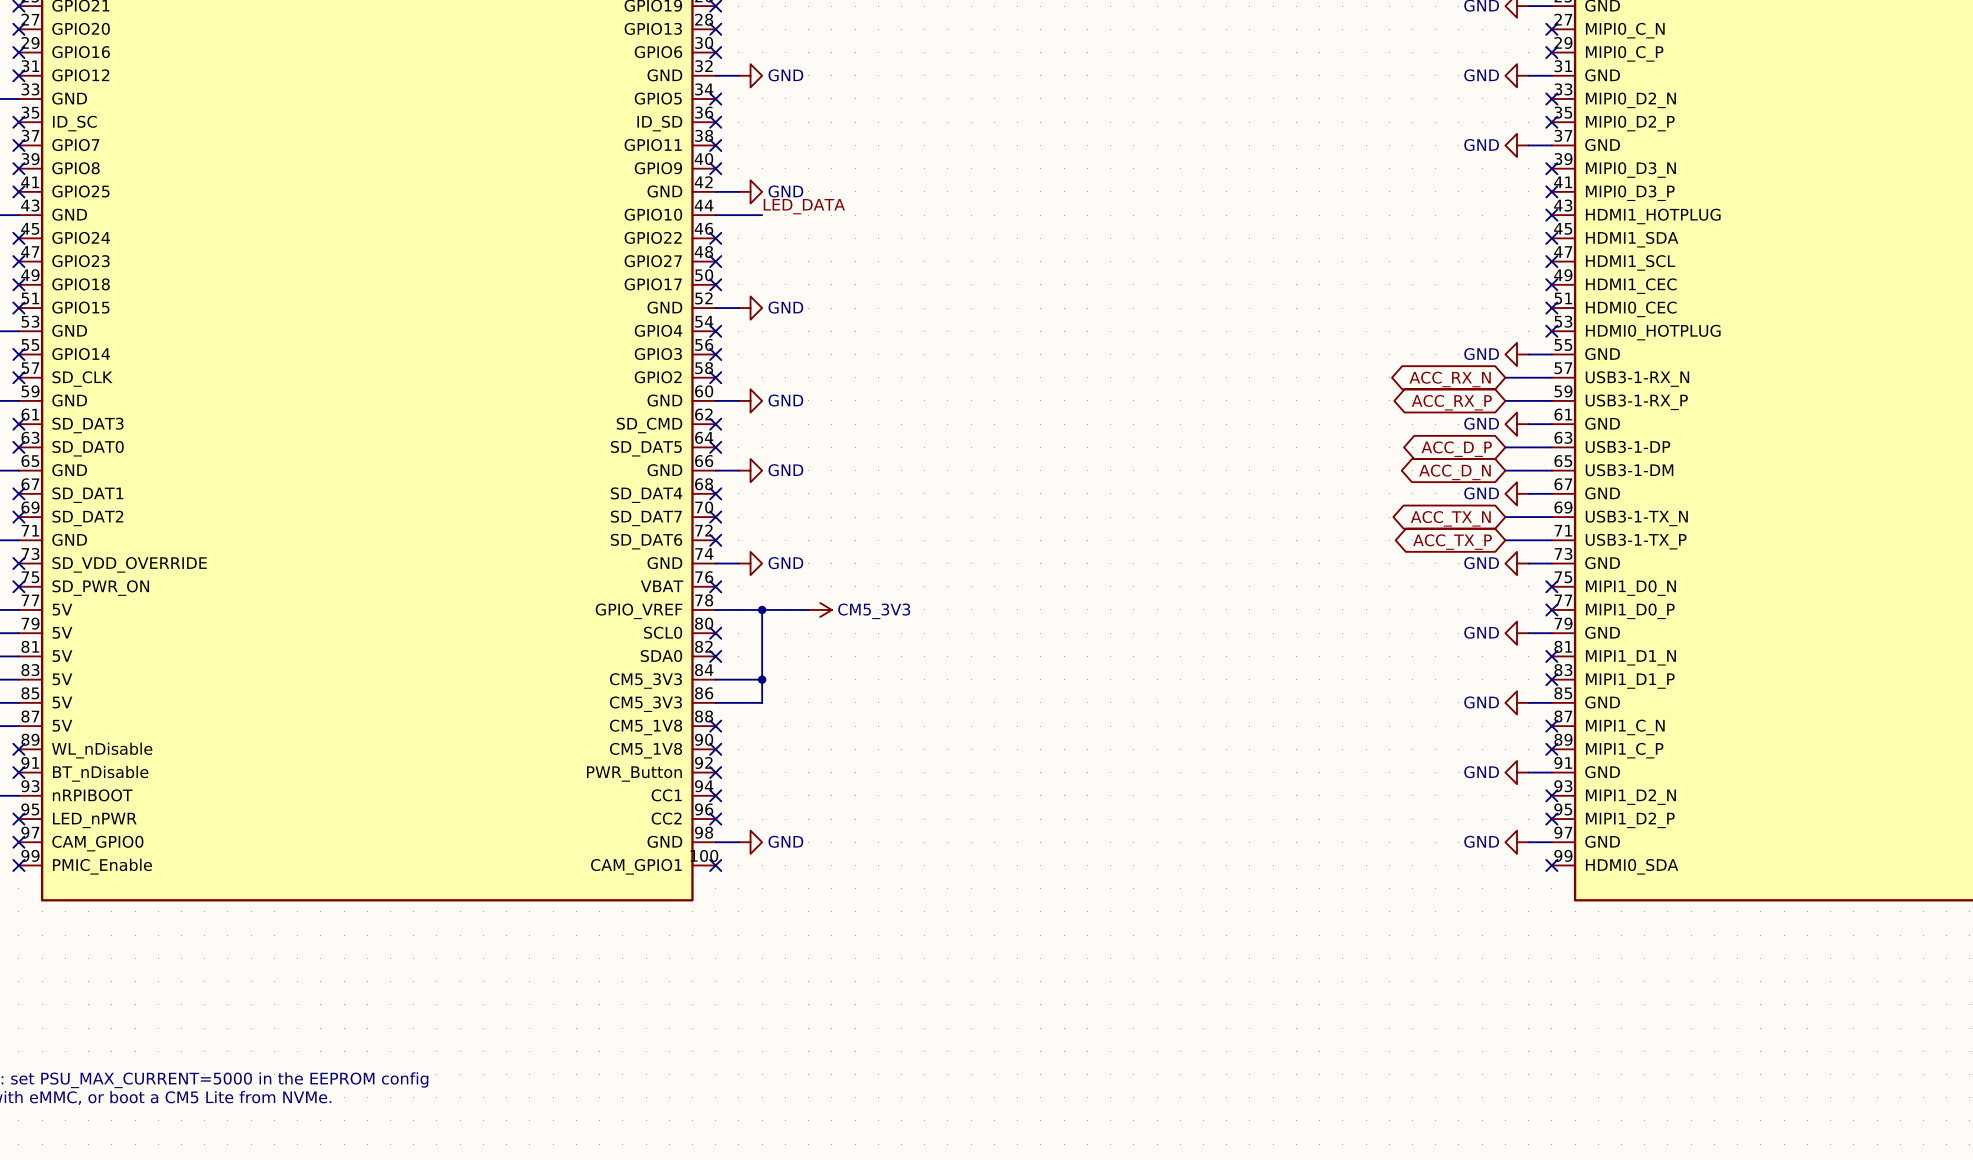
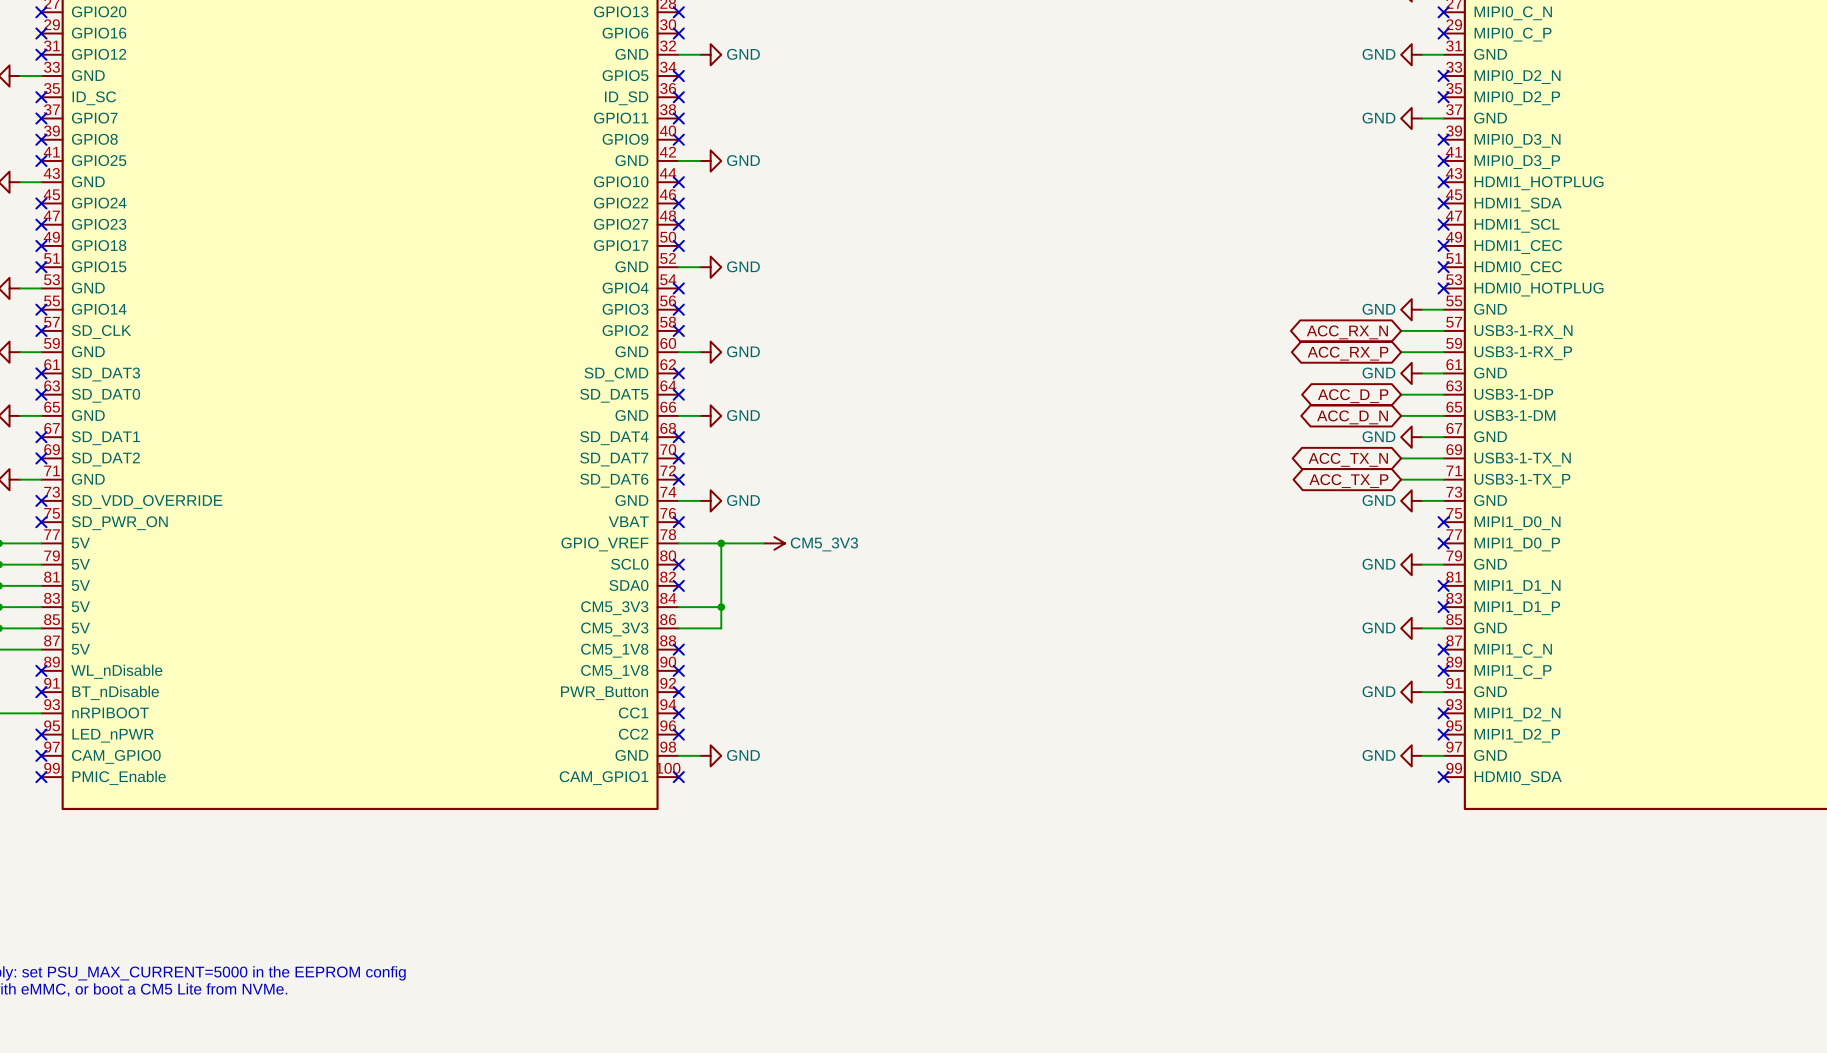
label: LED_DATA (804, 206) -> none
wire: (715, 215) (762, 215) -> none
no-connect mark: none -> (678, 182)

